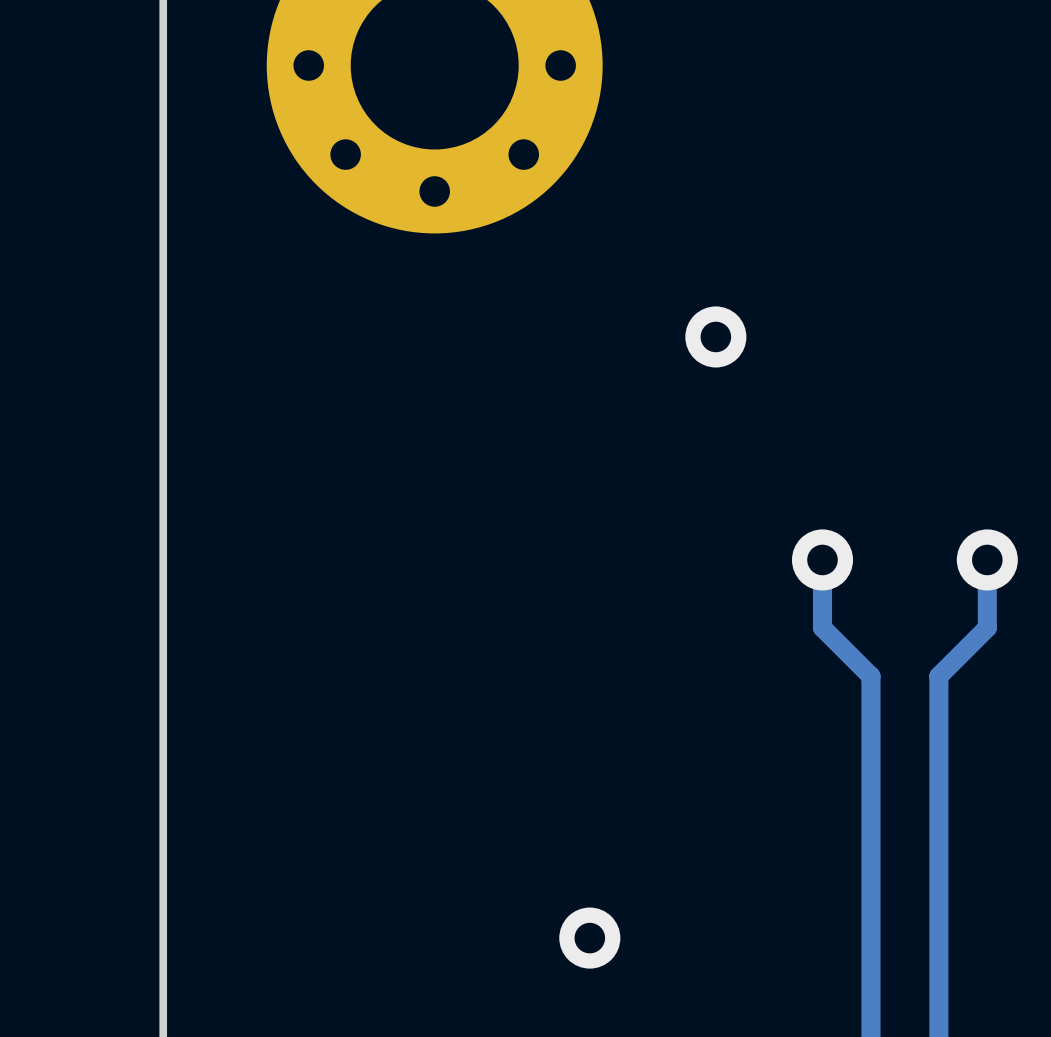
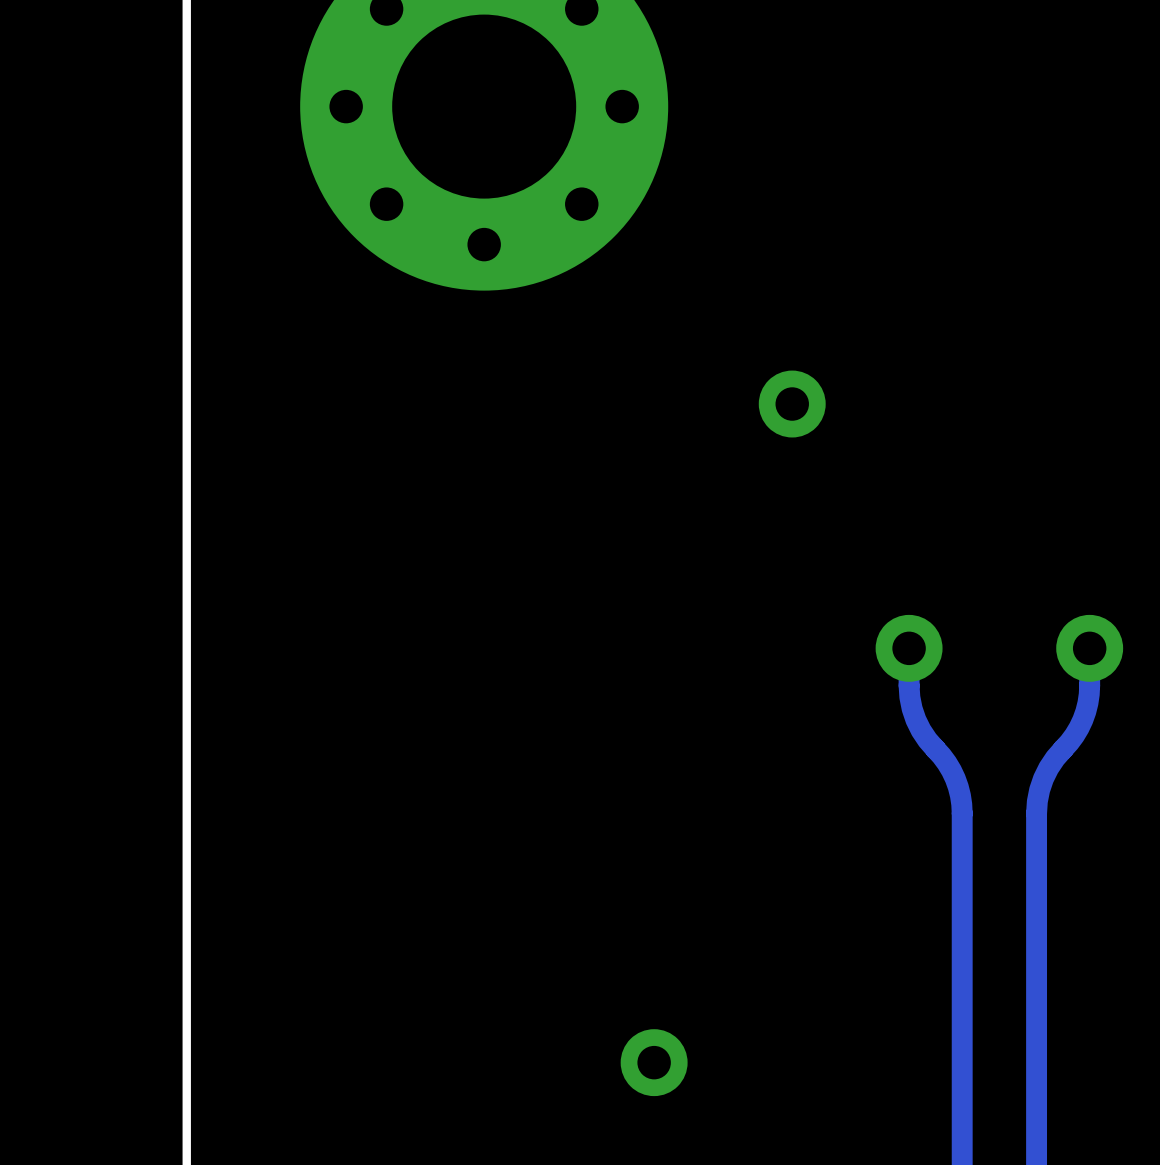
track: (822, 593) (822, 627) (870, 676) (870, 710) -> (935, 749) (946, 763) (955, 778) (960, 795) (962, 813)
track: none -> (909, 685) (912, 708) (915, 719) (927, 740) (935, 749)
track: (987, 593) (987, 627) (938, 676) (938, 710) -> (1063, 749) (1055, 758) (1043, 778) (1037, 801) (1036, 813)
track: none -> (1089, 685) (1087, 703) (1082, 719) (1074, 735) (1063, 749)

